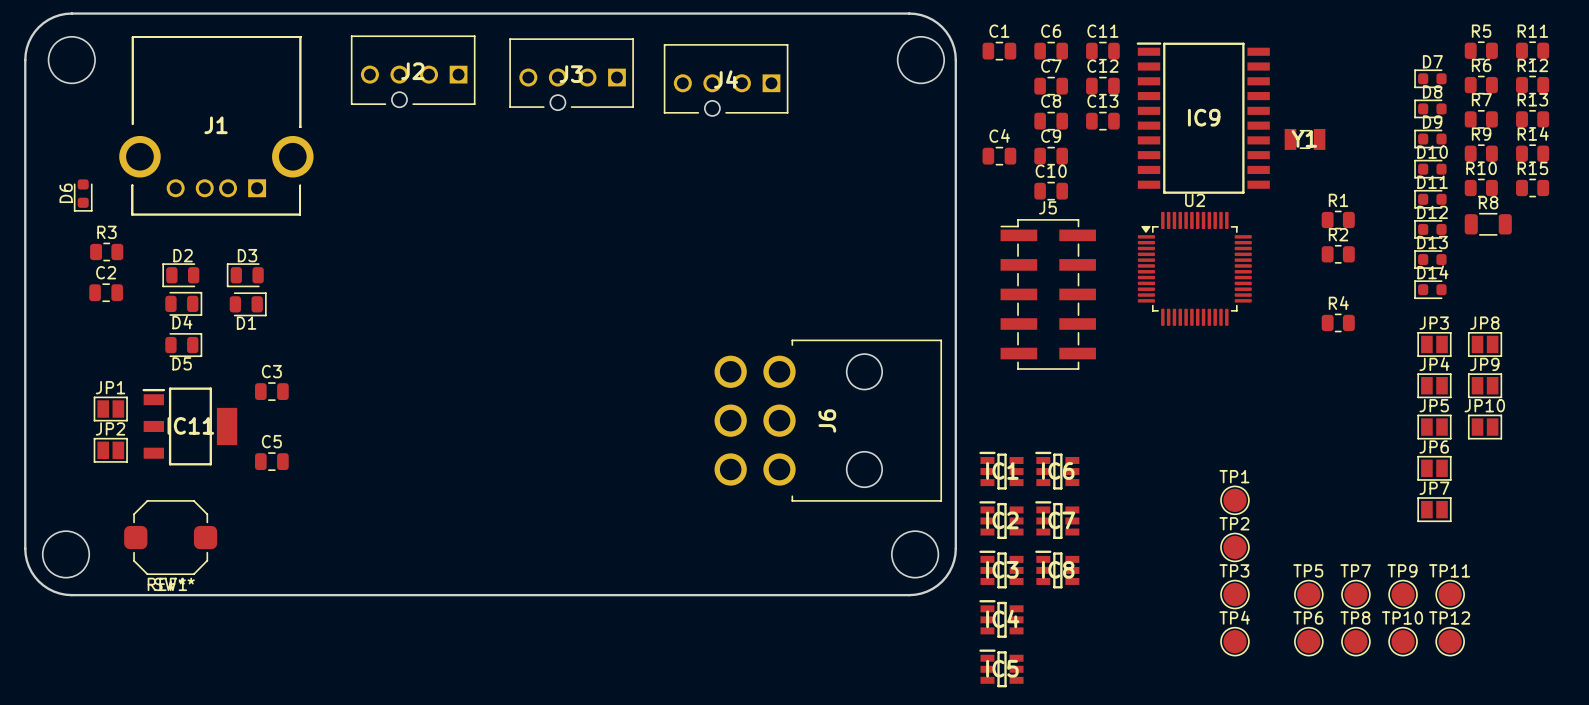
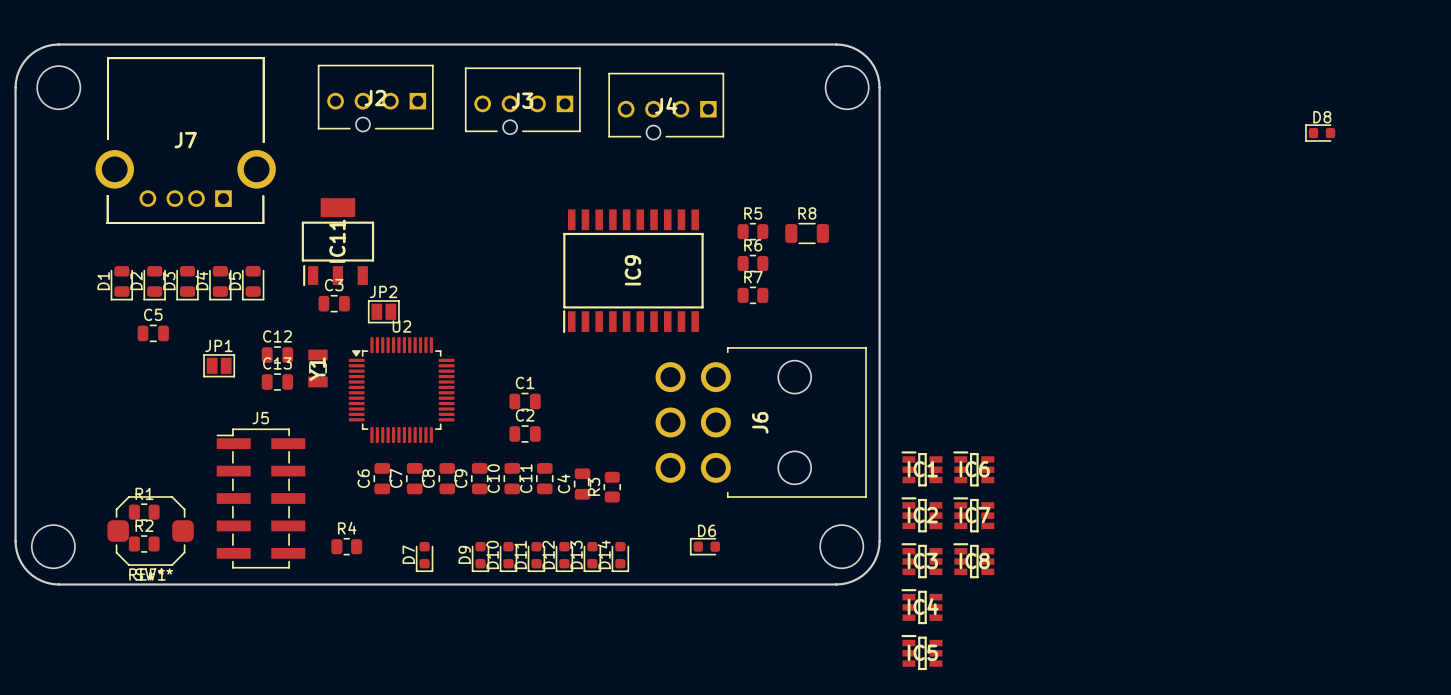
C6 name position: C6 (1051, 31) -> C6 (363, 478)
C11 name position: C11 (1102, 31) -> C11 (526, 478)
R5 position: (1481, 50) -> (752, 231)
R11: (1532, 50) -> none
C1 position: (999, 51) -> (525, 401)
C6 rotation: 0° (1051, 51) -> 90° clockwise (382, 478)
C6 position: (1051, 51) -> (382, 478)
C11 rotation: 0° (1102, 51) -> 90° clockwise (544, 478)
C11 position: (1102, 51) -> (544, 478)
C7 name position: C7 (1051, 66) -> C7 (396, 478)
D7 rotation: 0° (1430, 78) -> 90° counterclockwise (424, 556)
D7 position: (1430, 78) -> (424, 556)
R6 position: (1481, 85) -> (752, 263)
R12: (1532, 85) -> none
C7 rotation: 0° (1051, 86) -> 90° clockwise (414, 478)
C7 position: (1051, 86) -> (414, 478)
C12 position: (1102, 86) -> (277, 354)
C8 name position: C8 (1051, 101) -> C8 (428, 478)
J7: none -> (185, 140)
IC9 rotation: 0° (1203, 118) -> 90° counterclockwise (633, 271)
IC9 position: (1203, 118) -> (633, 271)
R7 position: (1481, 119) -> (752, 295)
R13: (1532, 119) -> none
C8 rotation: 0° (1051, 121) -> 90° clockwise (447, 478)
C8 position: (1051, 121) -> (447, 478)
C13 position: (1102, 121) -> (277, 381)
J1: (216, 125) -> none
C4 name position: C4 (999, 135) -> C4 (563, 483)
C9 name position: C9 (1051, 136) -> C9 (461, 478)
Y1 rotation: 0° (1305, 139) -> 90° clockwise (317, 368)
Y1 position: (1305, 139) -> (317, 368)
D9 rotation: 0° (1430, 139) -> 90° counterclockwise (480, 556)
D9 position: (1430, 139) -> (480, 556)
R9: (1481, 153) -> none
R14: (1532, 153) -> none
C4 rotation: 0° (999, 156) -> 90° clockwise (582, 484)
C4 position: (999, 156) -> (582, 484)
C9 rotation: 0° (1051, 156) -> 90° clockwise (479, 478)
C9 position: (1051, 156) -> (479, 478)
D10 rotation: 0° (1430, 169) -> 90° counterclockwise (508, 556)
D10 position: (1430, 169) -> (508, 556)
C10 name position: C10 (1051, 171) -> C10 (493, 478)
R10: (1481, 188) -> none
R15: (1532, 188) -> none
C10 rotation: 0° (1051, 191) -> 90° clockwise (512, 478)
C10 position: (1051, 191) -> (512, 478)
D6 rotation: 0° (83, 195) -> 90° clockwise (705, 546)
D6 position: (83, 195) -> (705, 546)
D11 rotation: 0° (1430, 199) -> 90° counterclockwise (536, 556)
D11 position: (1430, 199) -> (536, 556)
R1 position: (1338, 220) -> (144, 512)
R8 position: (1488, 224) -> (807, 233)
D12 rotation: 0° (1430, 229) -> 90° counterclockwise (564, 556)
D12 position: (1430, 229) -> (564, 556)
R3 name position: R3 (106, 232) -> R3 (594, 486)
R3 rotation: 0° (106, 251) -> 90° clockwise (612, 487)
R3 position: (106, 251) -> (612, 487)
R2 position: (1338, 254) -> (144, 543)
D13 rotation: 0° (1430, 259) -> 90° counterclockwise (592, 556)
D13 position: (1430, 259) -> (592, 556)
U2 position: (1194, 268) -> (401, 390)
D2 rotation: 0° (180, 275) -> 90° counterclockwise (154, 283)
D3 rotation: 0° (245, 275) -> 90° counterclockwise (187, 283)
D3 position: (245, 275) -> (187, 283)
D14 rotation: 0° (1430, 289) -> 90° counterclockwise (620, 556)
D14 position: (1430, 289) -> (620, 556)
C2 position: (106, 292) -> (525, 433)
J5 position: (1048, 294) -> (261, 498)
D4 rotation: 0° (183, 303) -> 90° clockwise (220, 283)
D4 position: (183, 303) -> (220, 283)
D1 rotation: 0° (248, 304) -> 90° clockwise (121, 283)
D1 position: (248, 304) -> (121, 283)
R4 position: (1338, 322) -> (346, 546)
JP3: (1434, 344) -> none
JP8: (1485, 344) -> none
D5 rotation: 0° (183, 345) -> 90° clockwise (253, 283)
D5 position: (183, 345) -> (253, 283)
JP4: (1434, 385) -> none
JP9: (1485, 385) -> none
C3 position: (271, 391) -> (334, 303)
JP1 position: (110, 409) -> (219, 365)
IC11 rotation: 0° (189, 426) -> 90° counterclockwise (337, 242)
IC11 position: (189, 426) -> (337, 242)
JP5: (1434, 427) -> none
JP10: (1485, 427) -> none
JP2 position: (110, 450) -> (383, 311)
C5 position: (271, 461) -> (153, 333)
JP6: (1434, 468) -> none
TP1: (1234, 500) -> none
JP7: (1434, 509) -> none
TP2: (1234, 547) -> none
TP3: (1234, 594) -> none
TP5: (1308, 594) -> none
TP7: (1355, 594) -> none
TP9: (1403, 594) -> none
TP11: (1450, 594) -> none
TP4: (1234, 641) -> none
TP6: (1308, 641) -> none
TP8: (1355, 641) -> none
TP10: (1403, 641) -> none
TP12: (1450, 641) -> none

